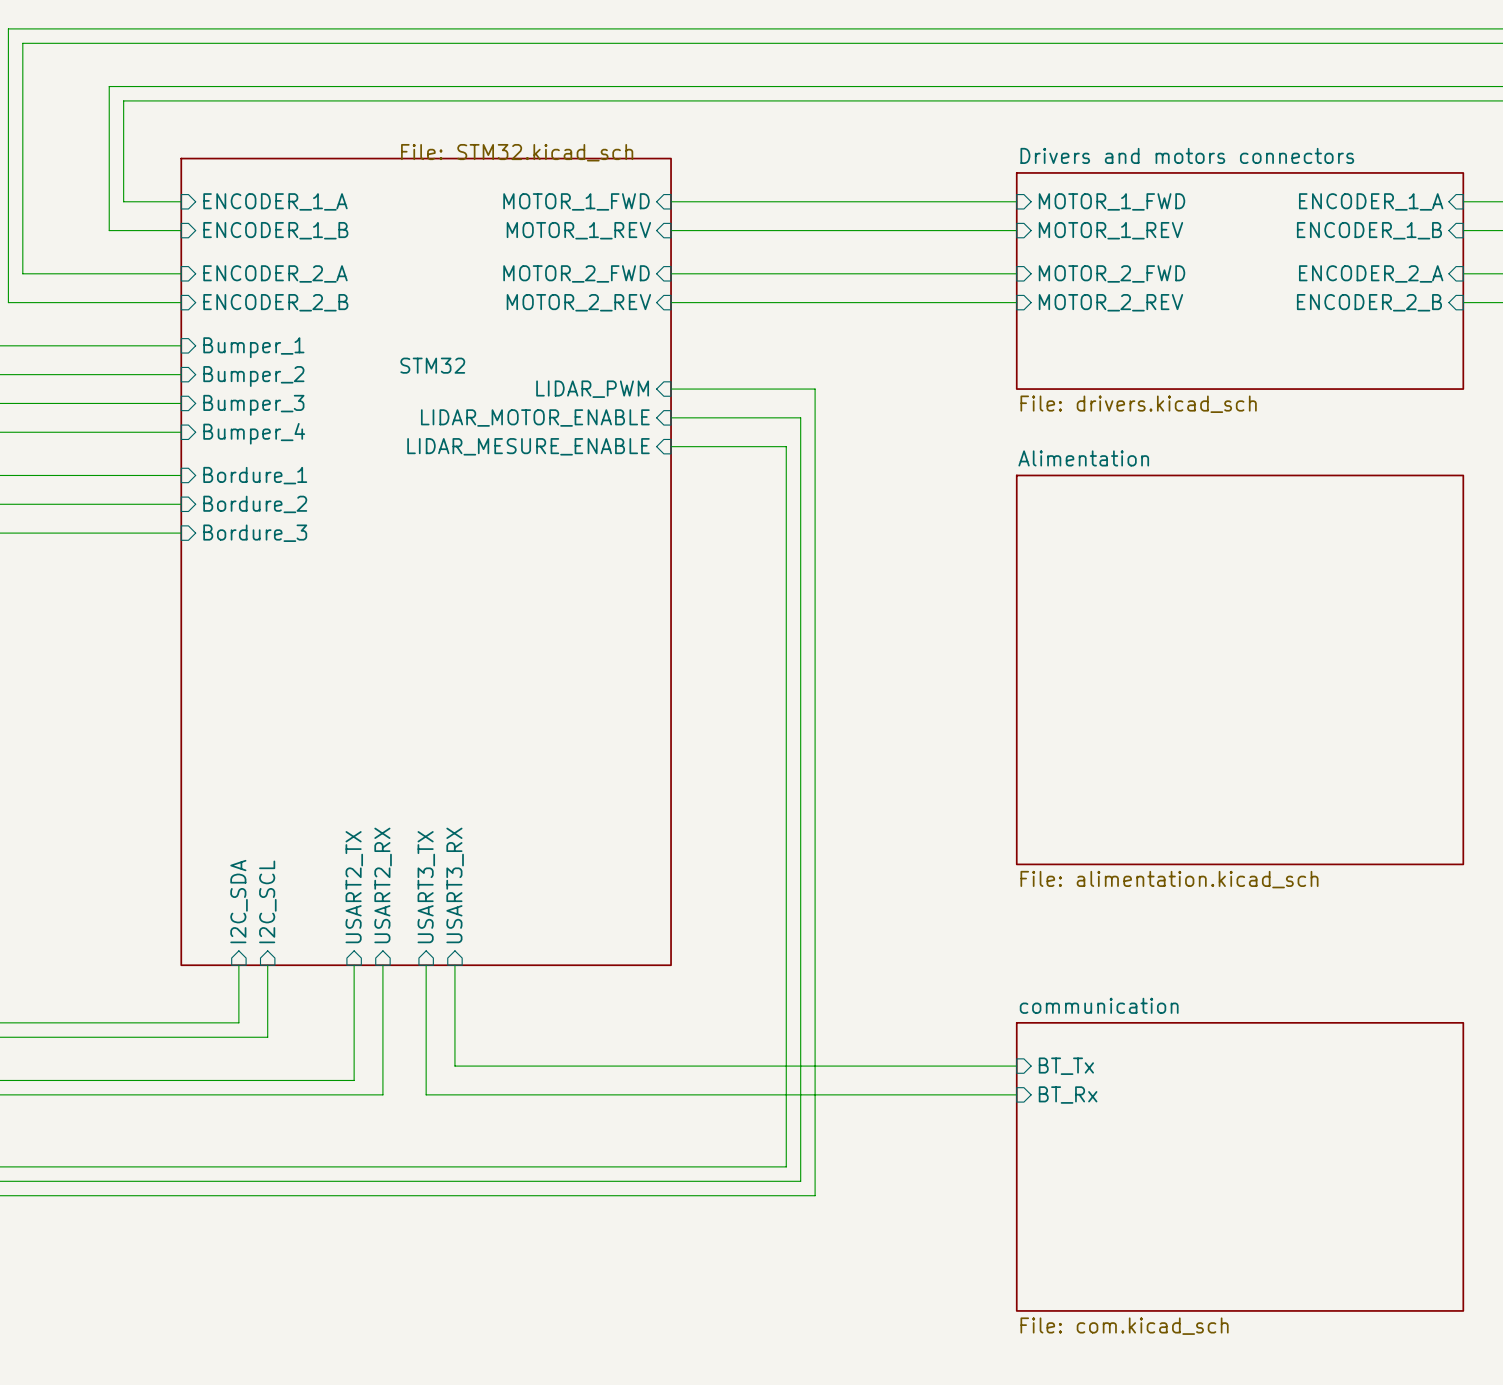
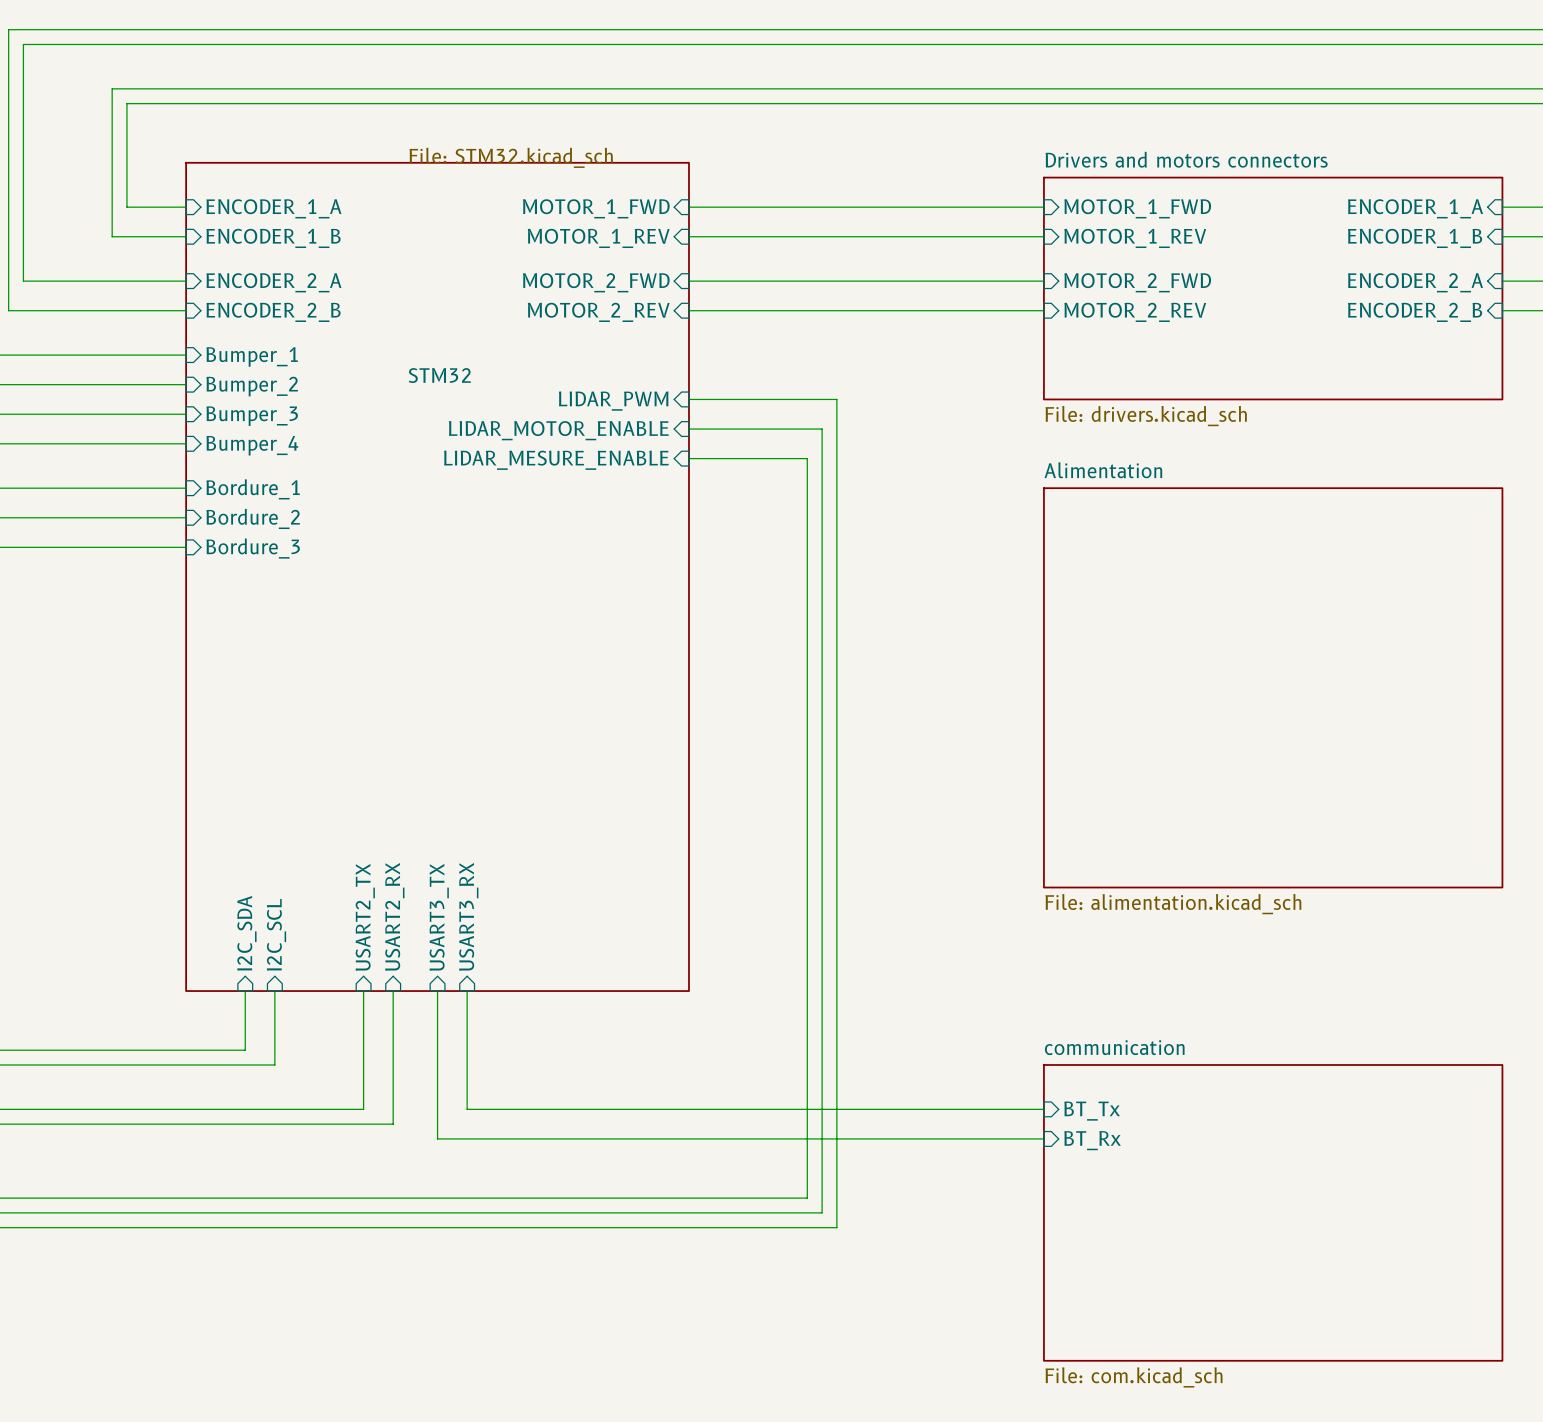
wire: (454, 1066) (1016, 1066) -> (467, 1094) (467, 1109) (1043, 1109)
sheet pin position: BT_Tx (1066, 1066) -> BT_Tx (1092, 1111)
wire: (426, 1094) (1016, 1094) -> (437, 1124) (437, 1138) (1043, 1138)
sheet pin position: BT_Rx (1068, 1095) -> BT_Rx (1092, 1140)
sheet communication position: (1240, 1166) -> (1273, 1212)

